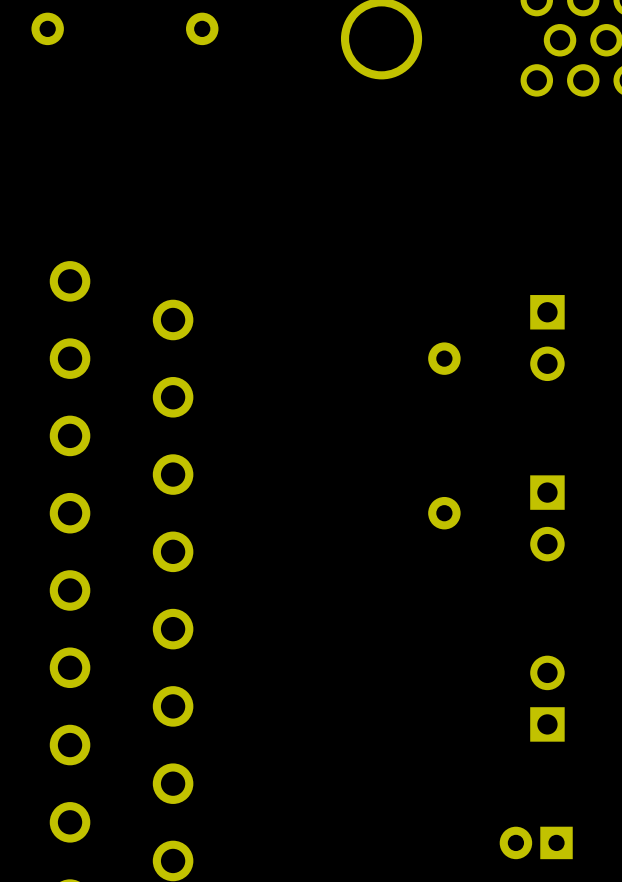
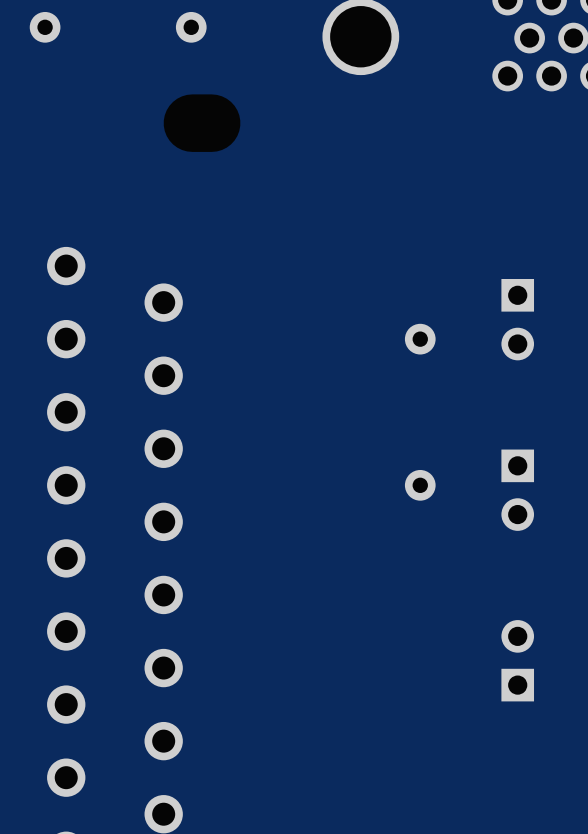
part: (536, 842) -> none

